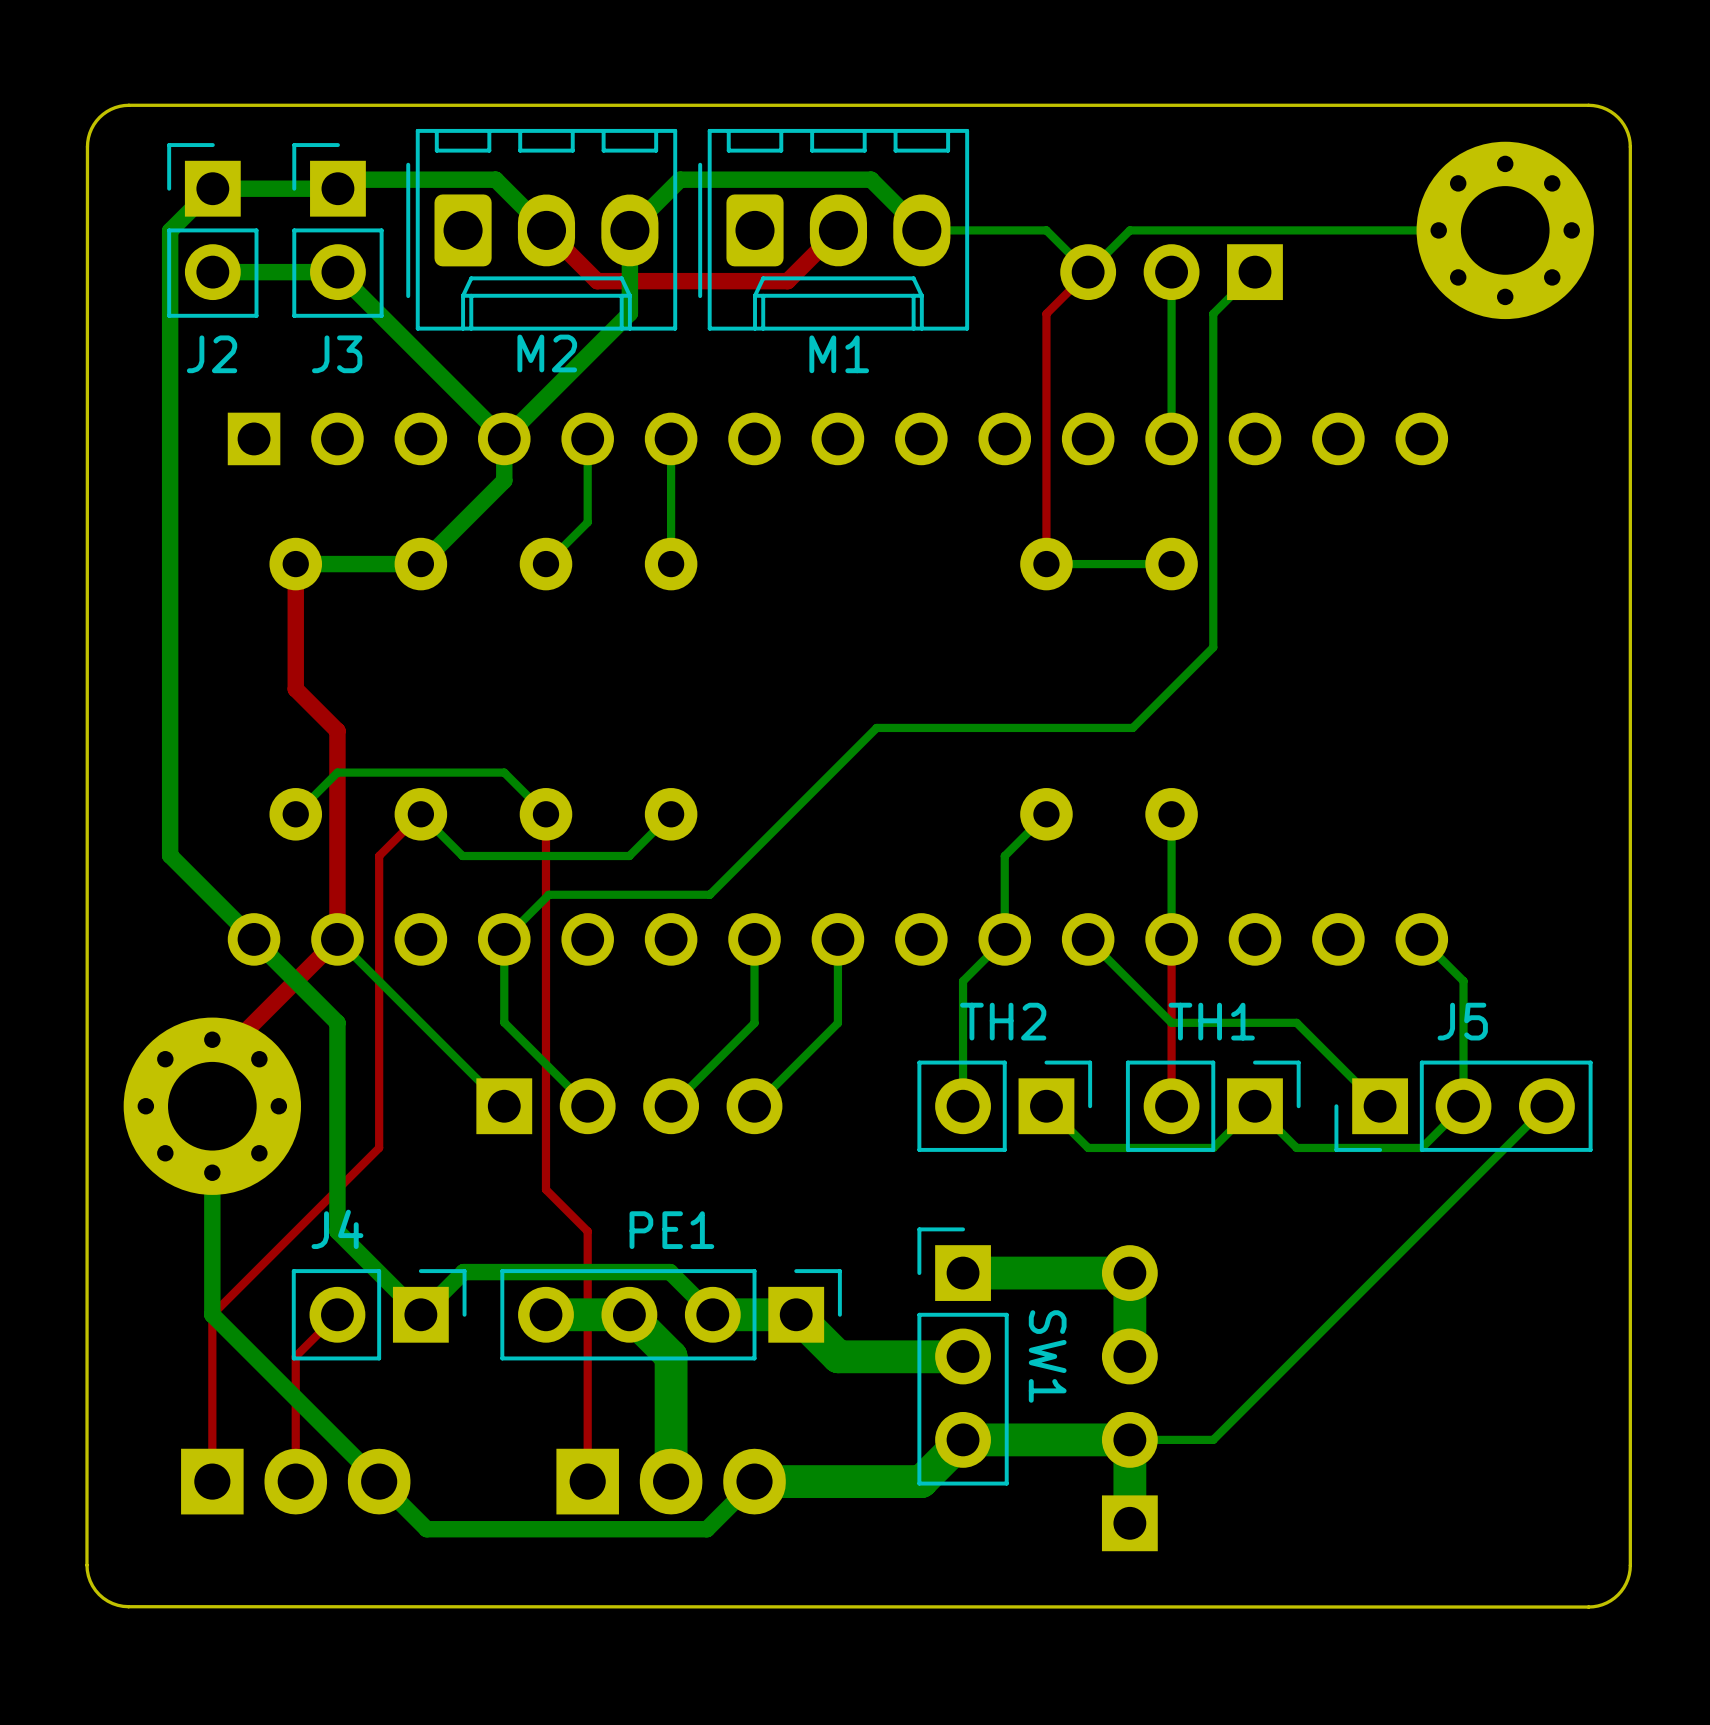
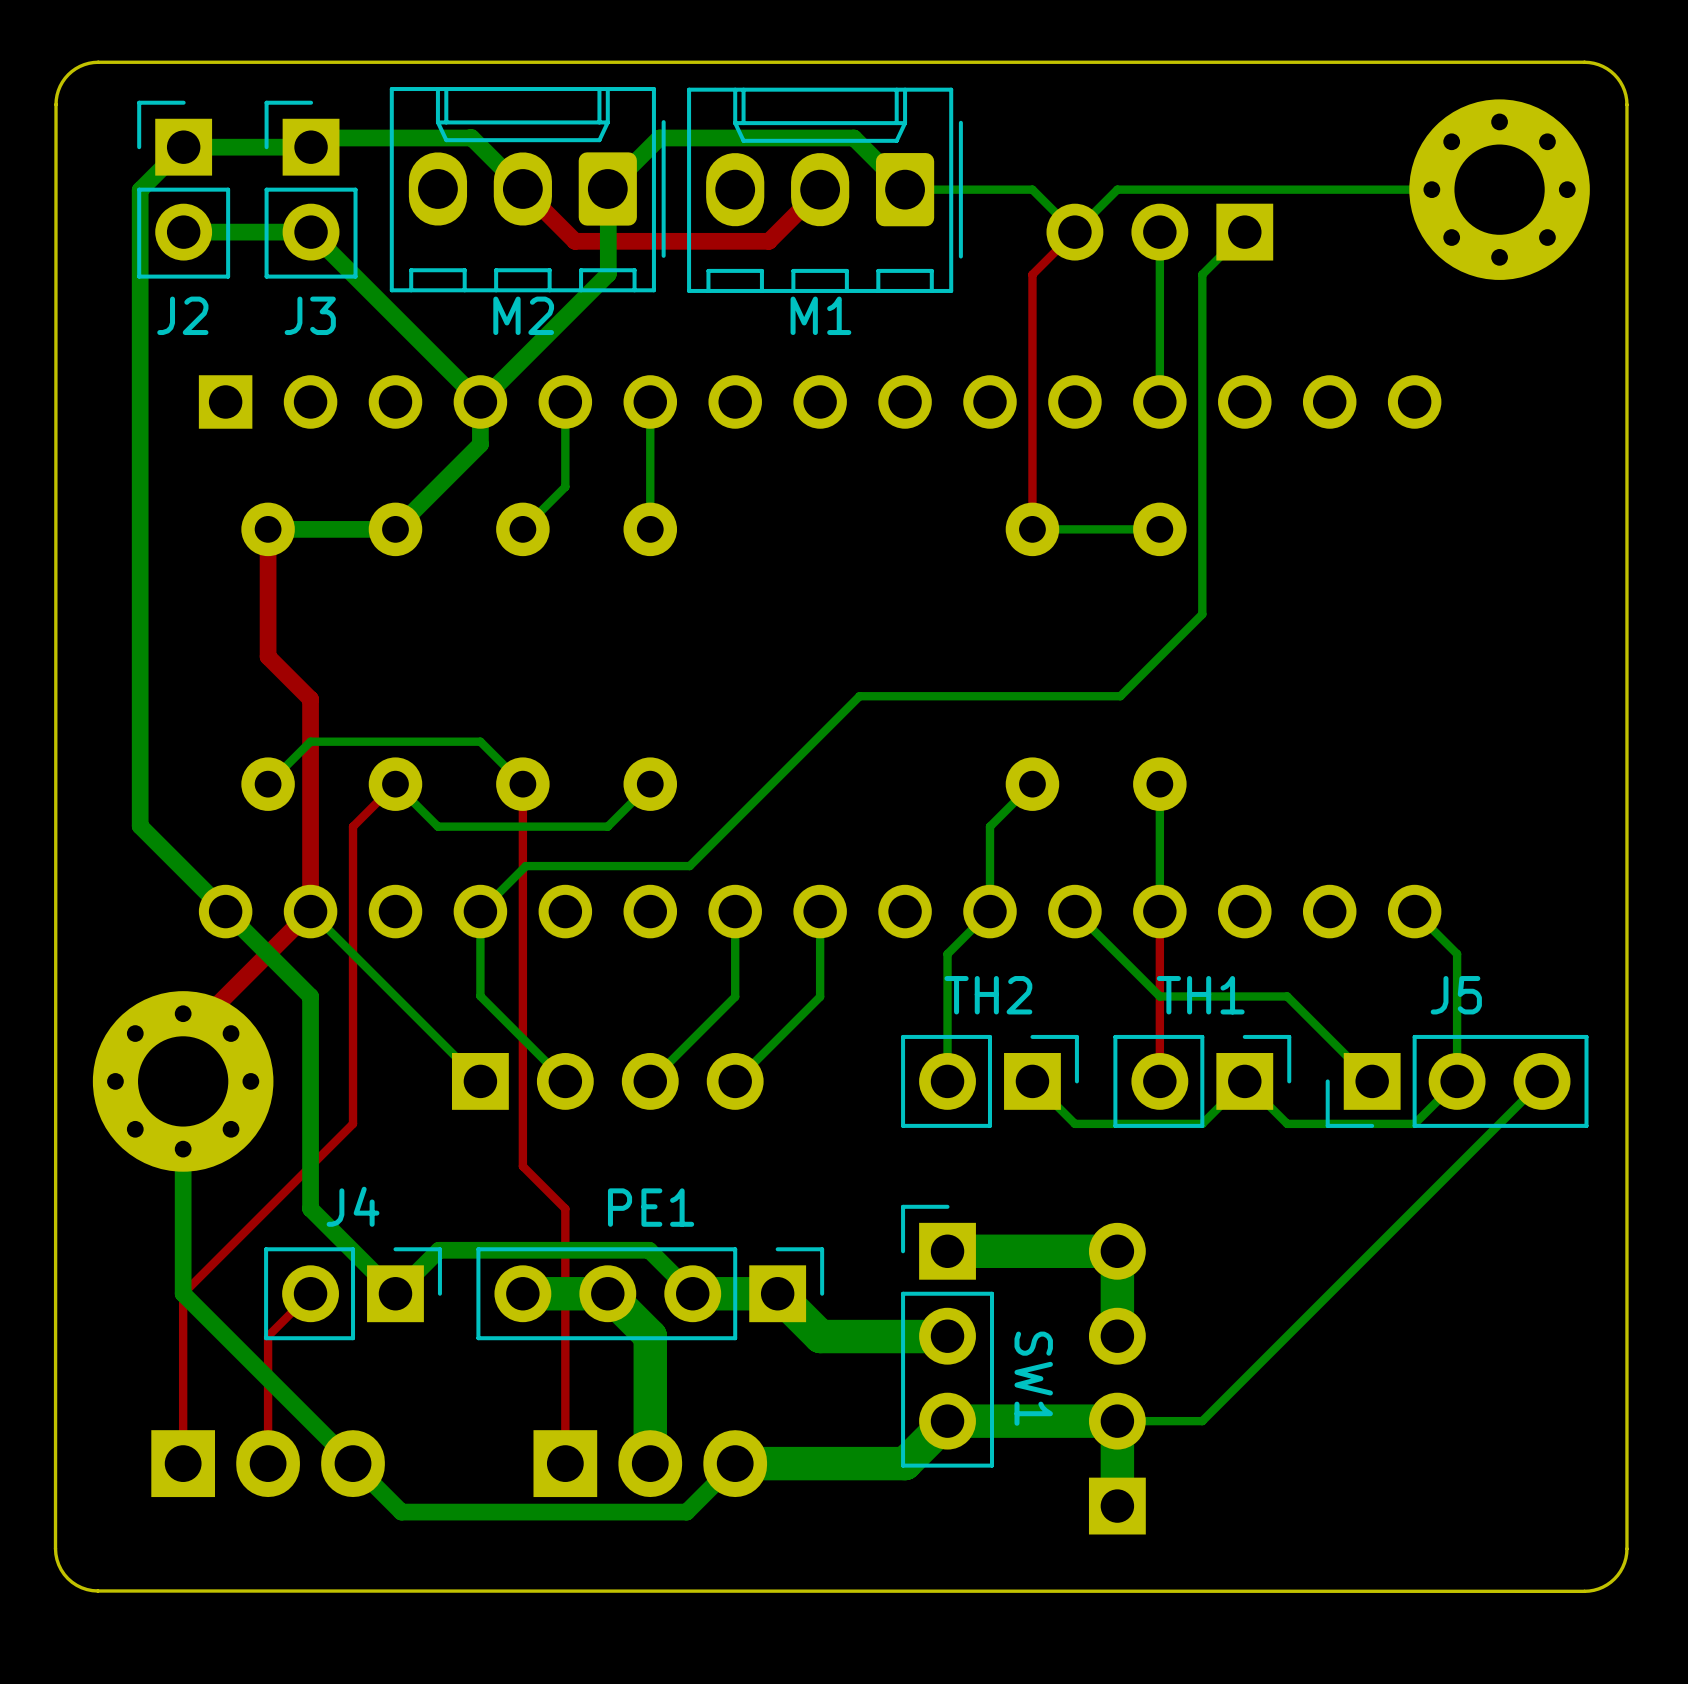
M2 rotation: 0° (541, 229) -> 180° (527, 189)
M1 rotation: 0° (833, 229) -> 180° (824, 190)
J4 name position: J4 (337, 1229) -> J4 (353, 1206)
SW1 name position: SW1 (1047, 1356) -> SW1 (1033, 1378)

